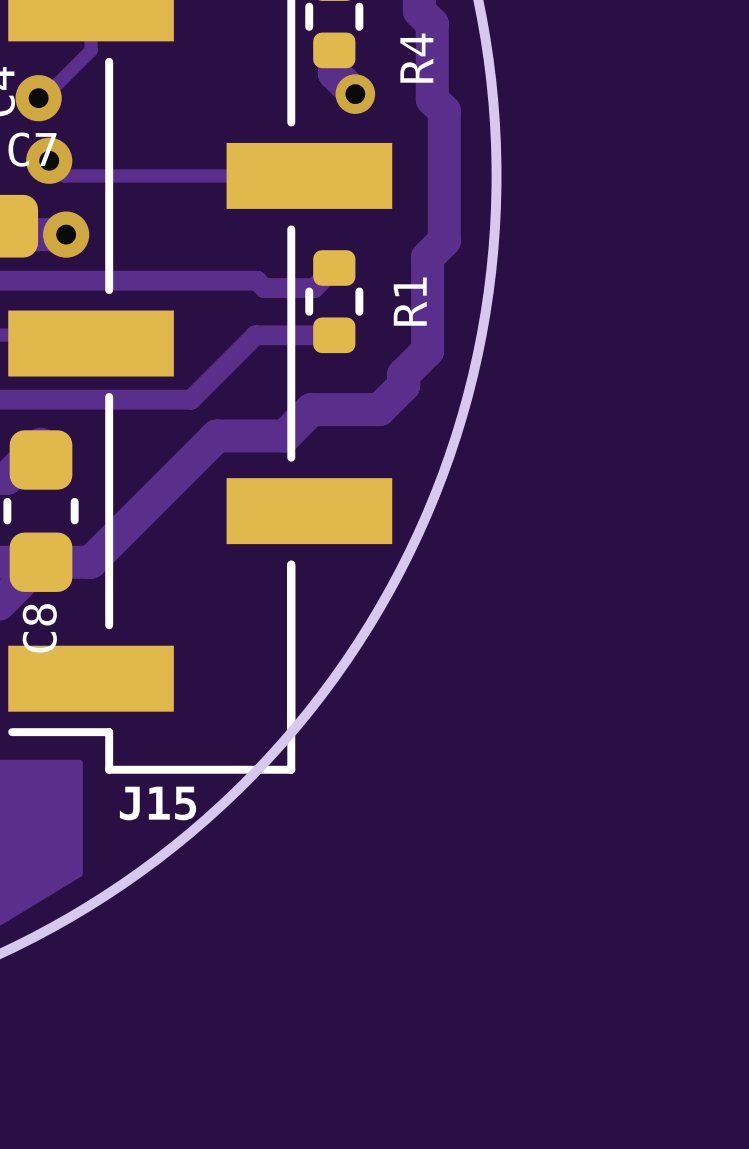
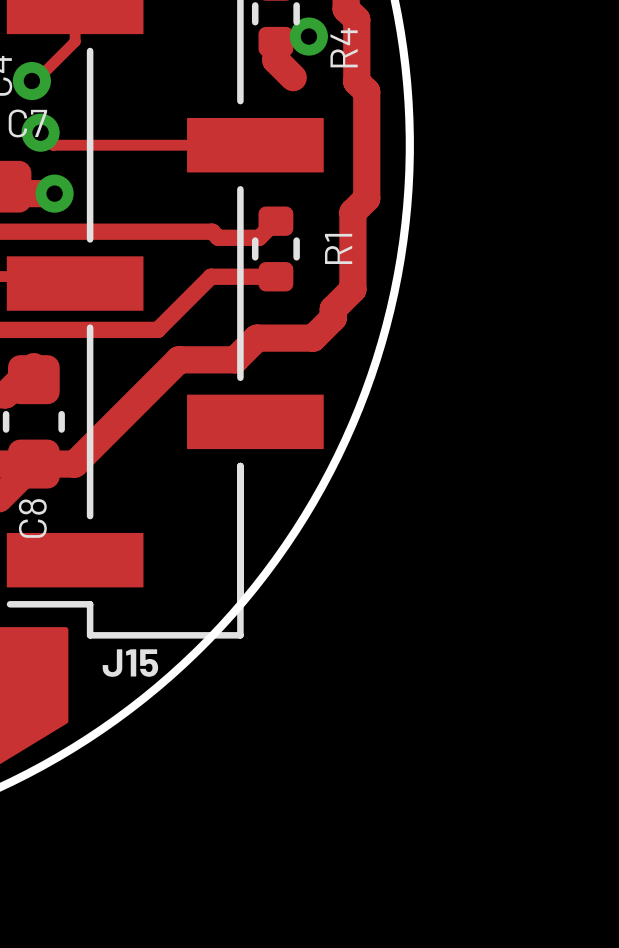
via: none -> (308, 36)
via: (355, 94) -> none

